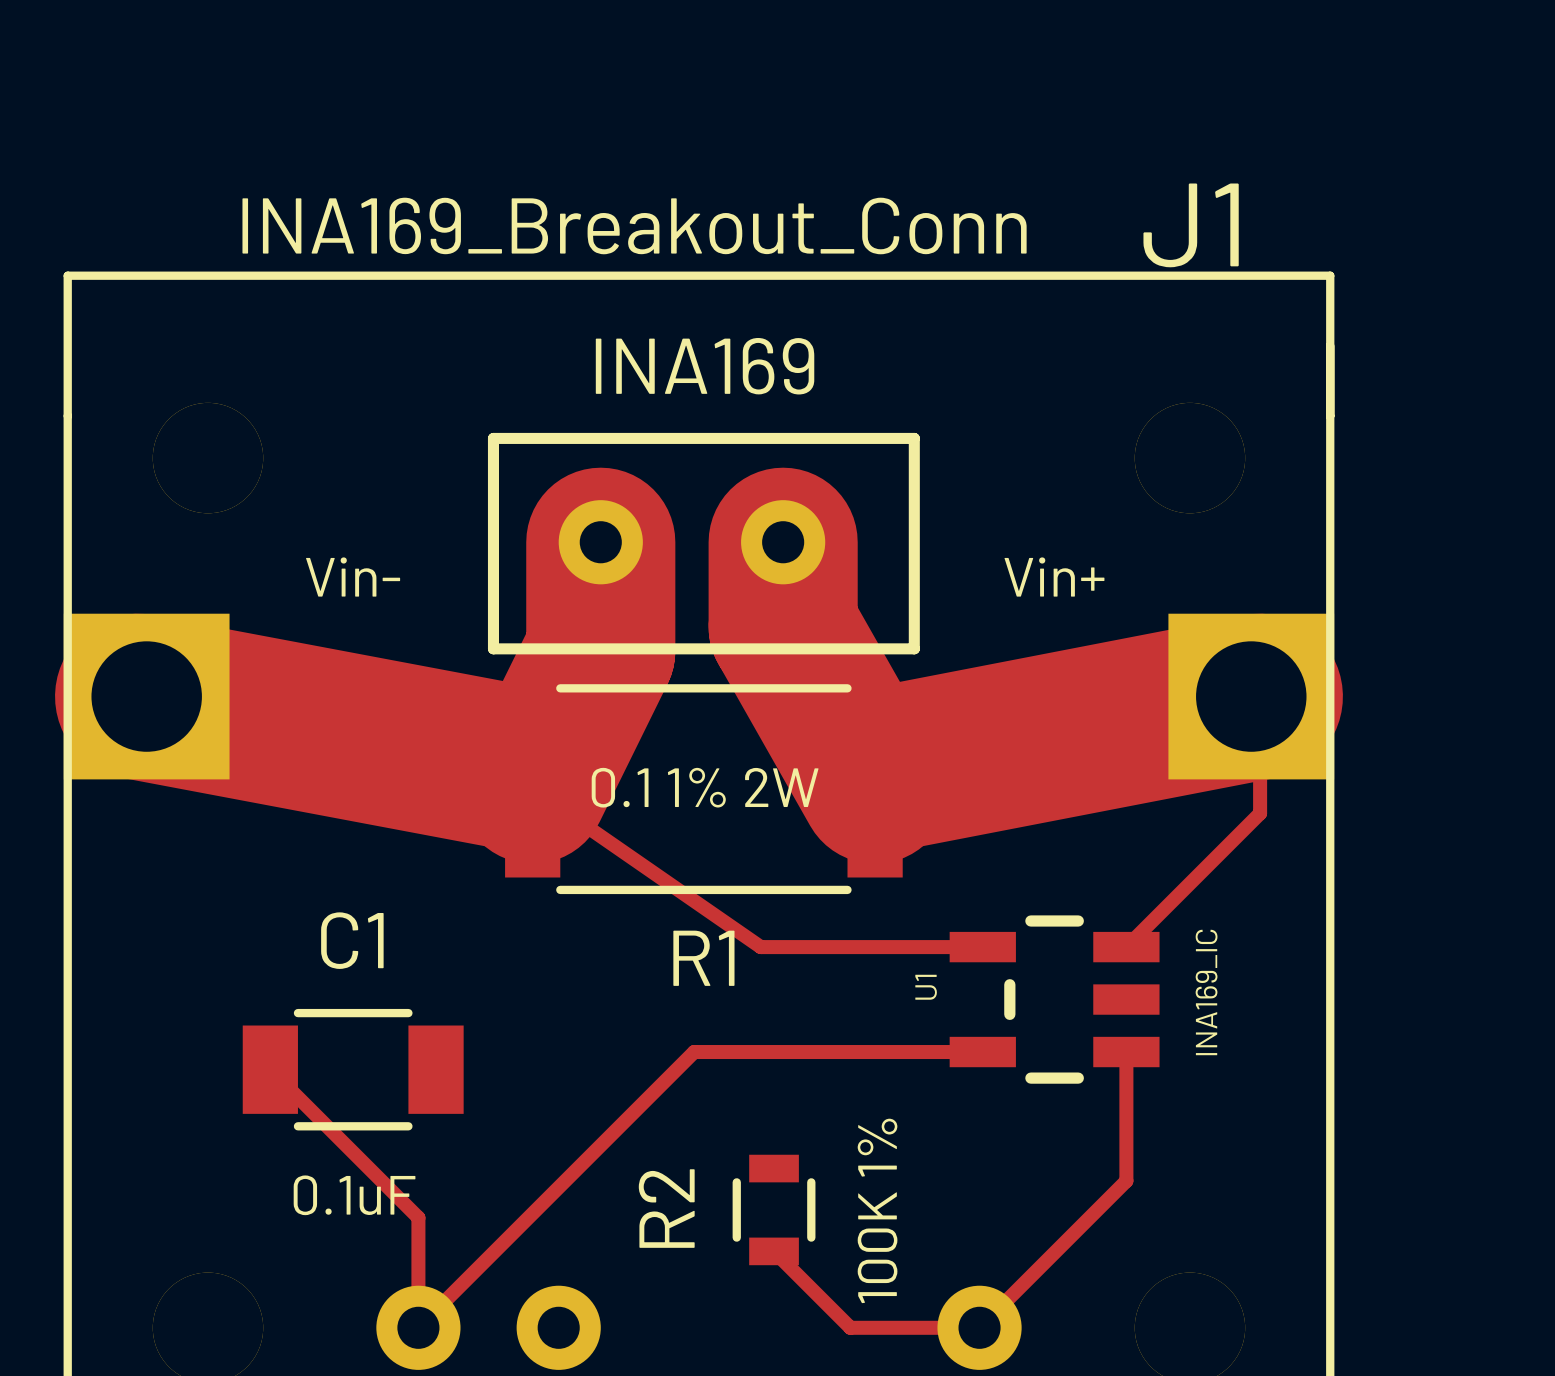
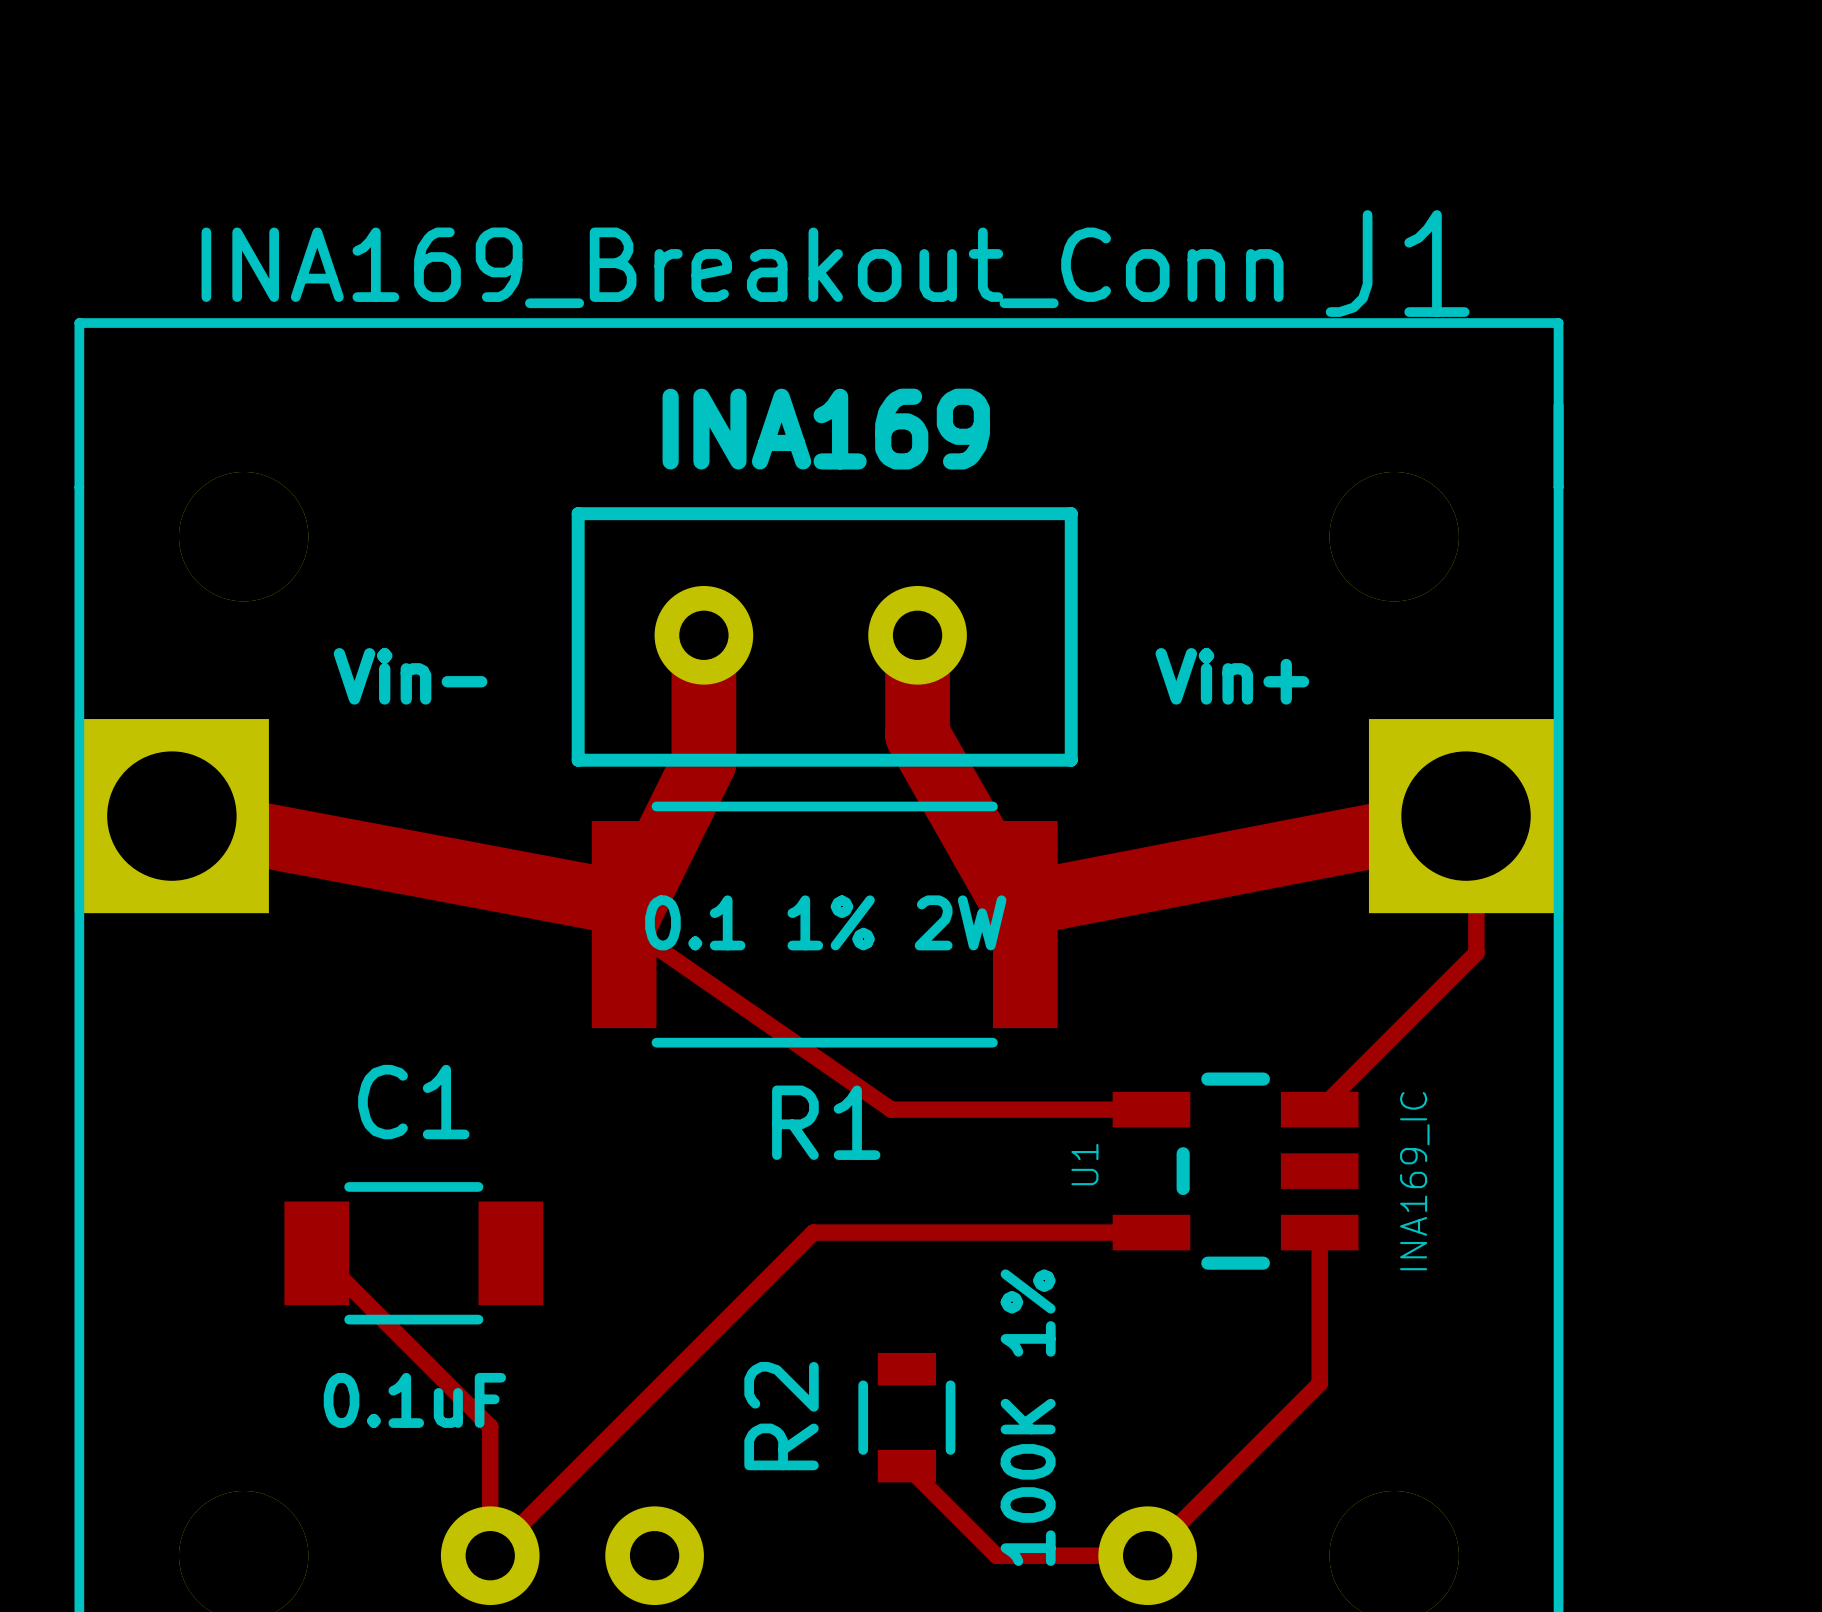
top track width: thick (600, 542) (600, 650) (532, 789) -> thin (703, 635) (703, 762) (624, 924)
top track width: thick (783, 542) (783, 627) (875, 789) -> thin (917, 635) (917, 734) (1025, 924)
top track width: thick (137, 696) (510, 766) -> thin (161, 816) (597, 898)
top track width: thick (1260, 696) (897, 766) -> thin (1476, 816) (1051, 898)

